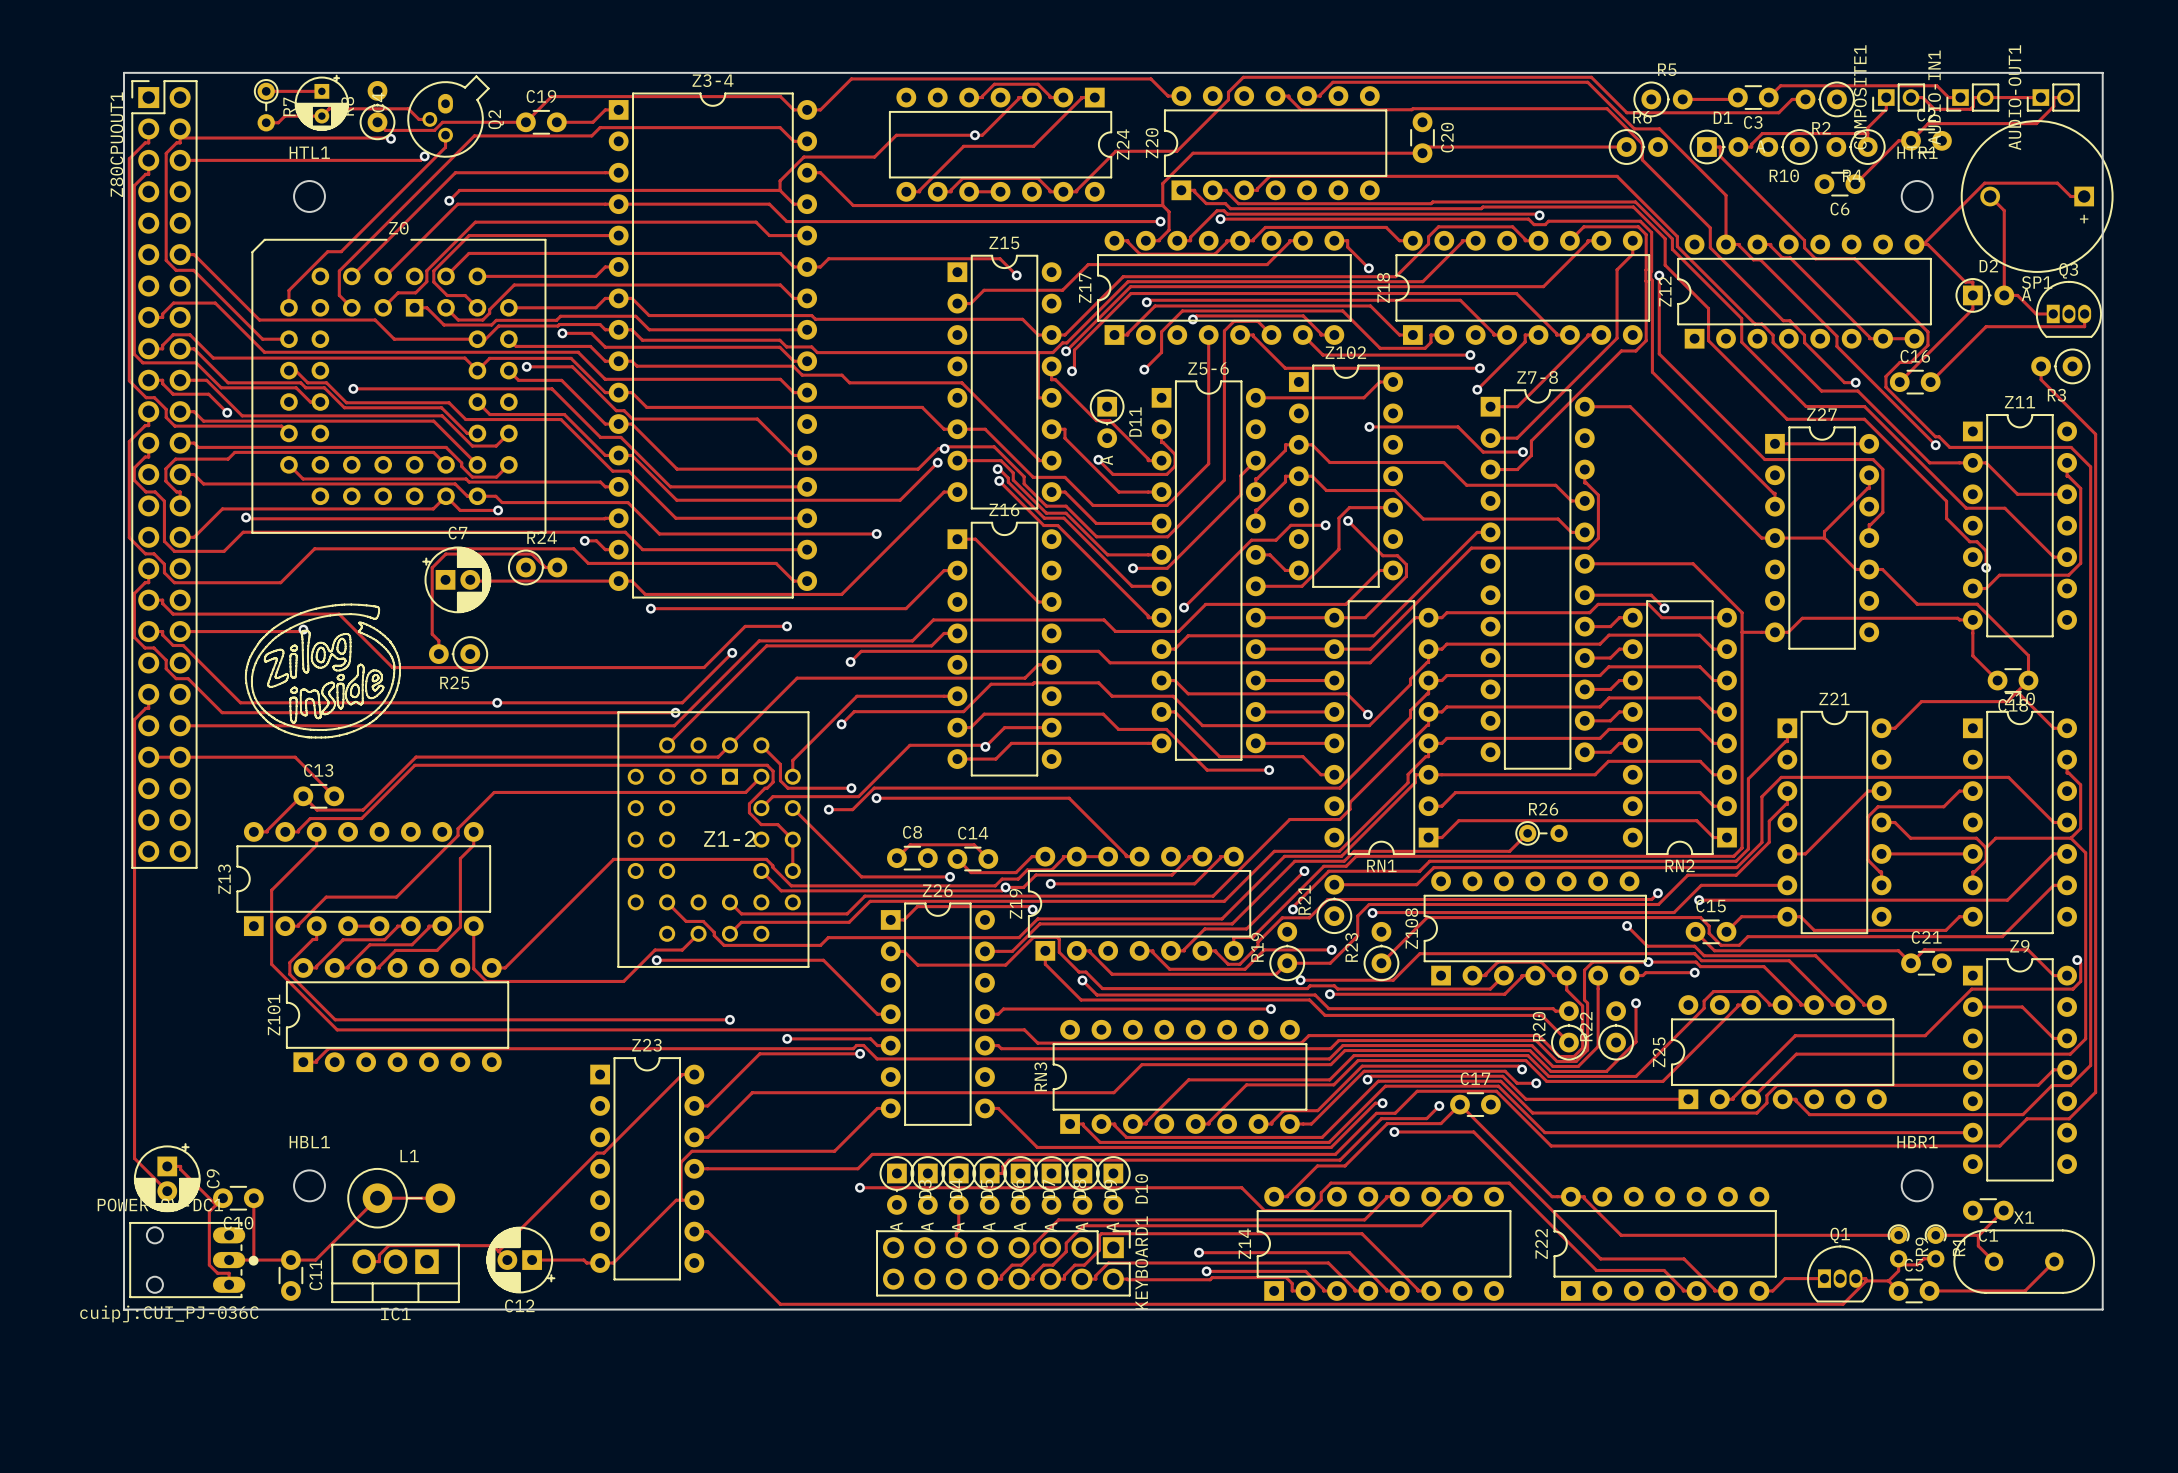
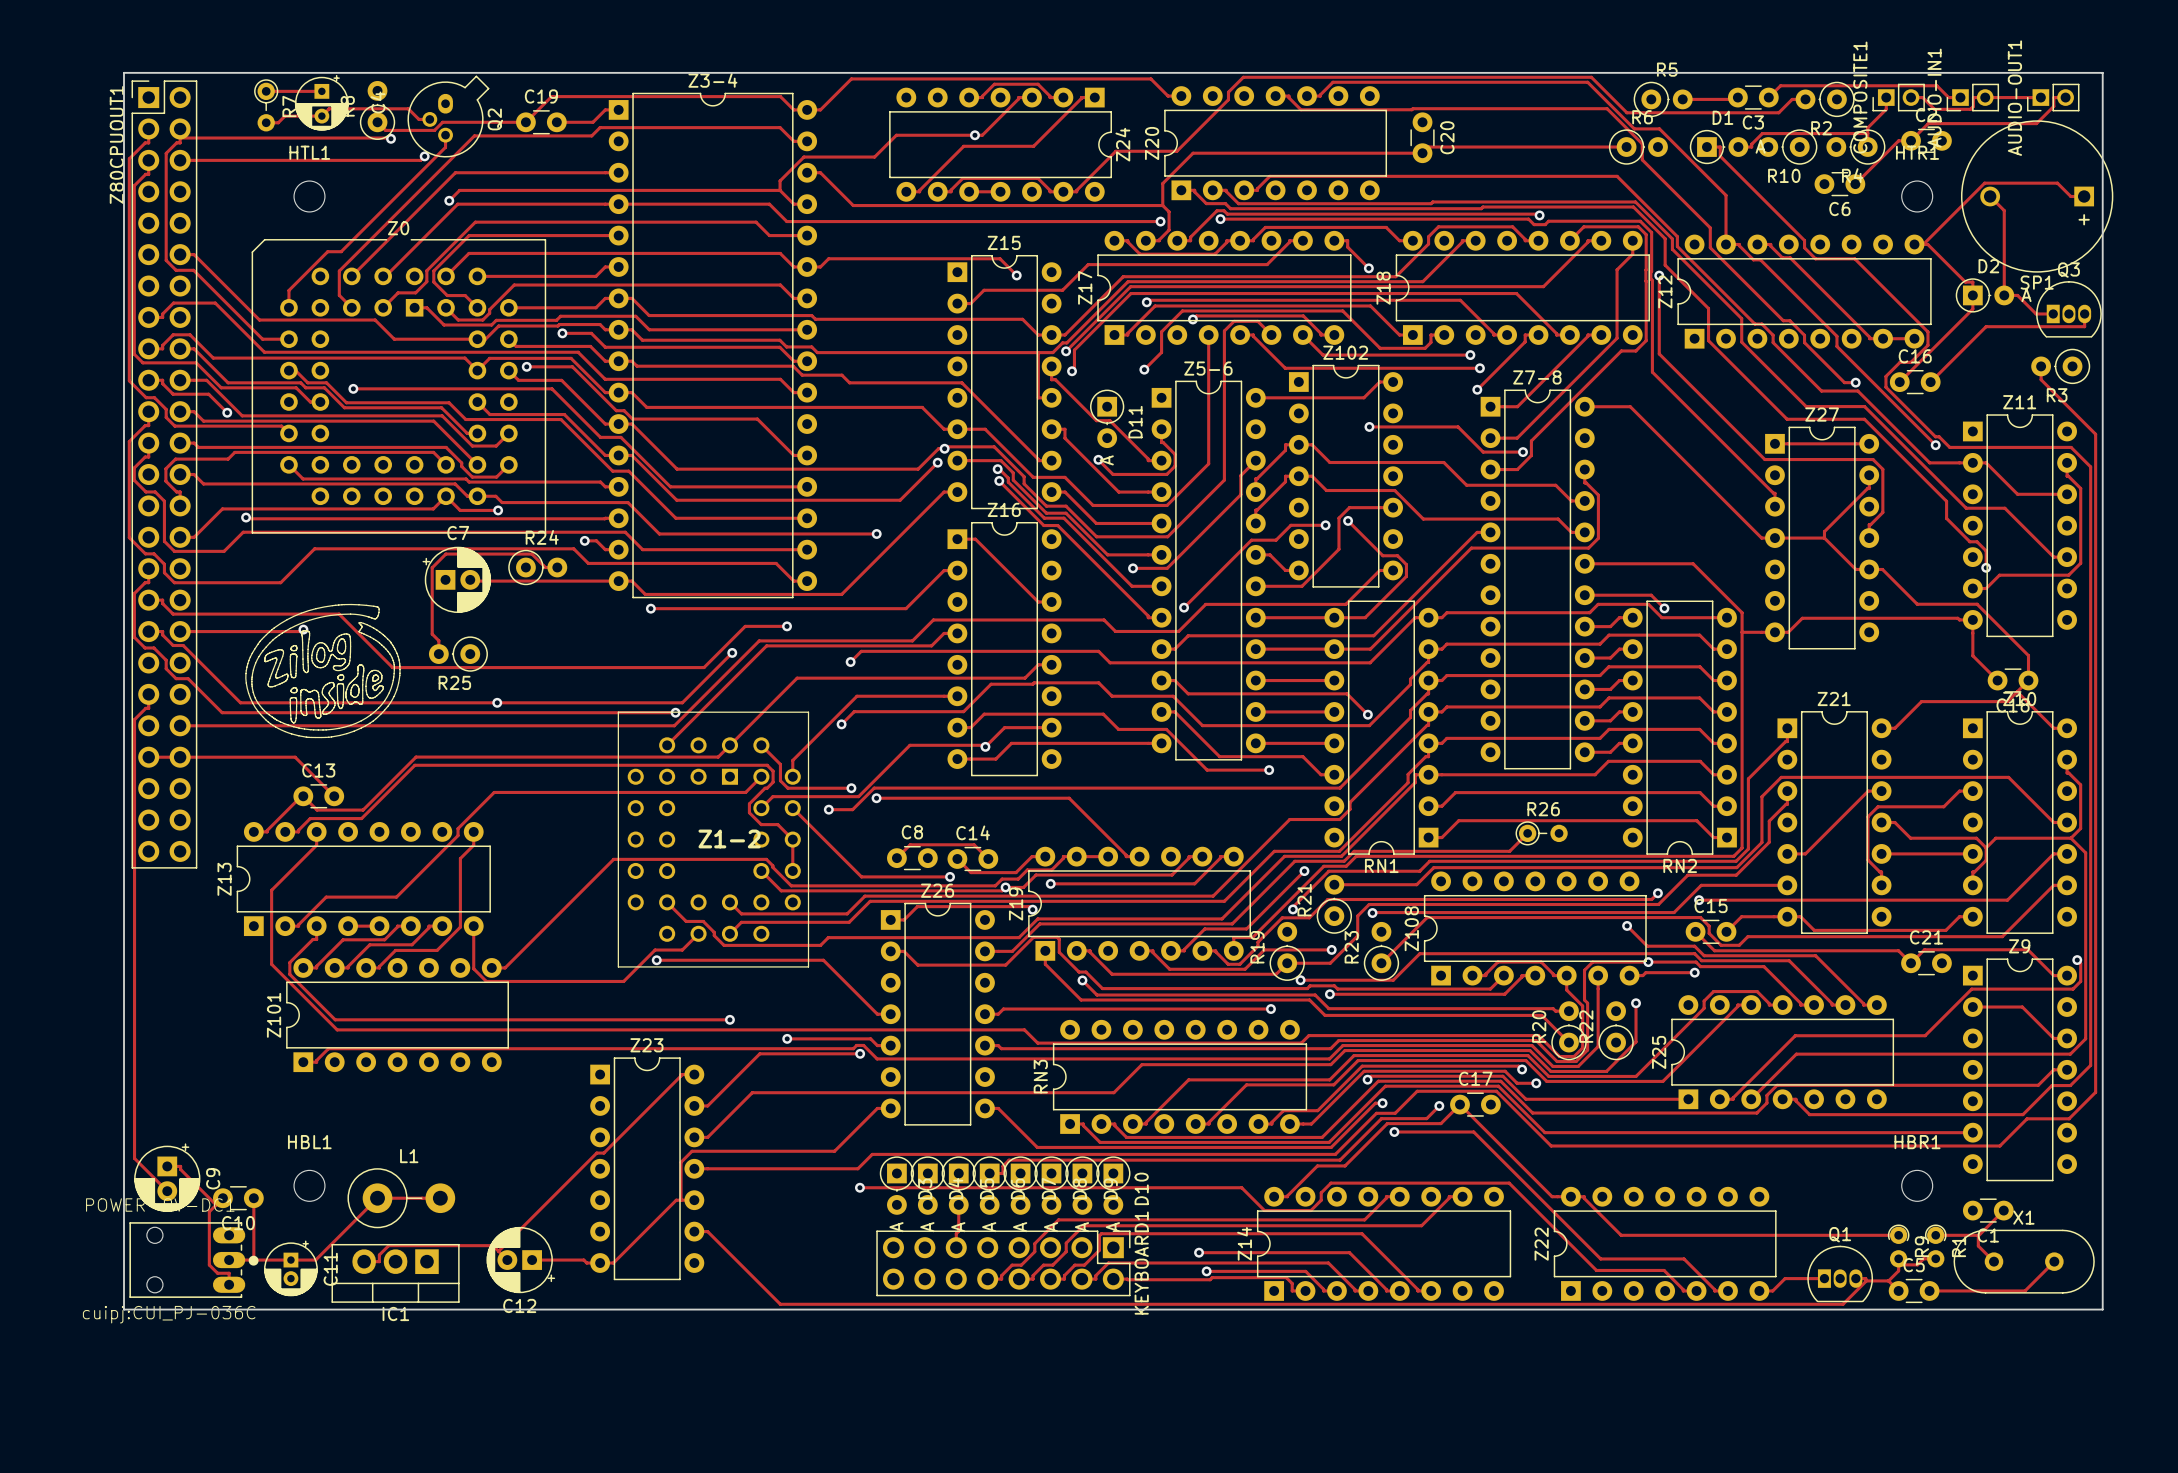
C11 footprint: [278, 1250, 304, 1301] -> [263, 1240, 318, 1297]

